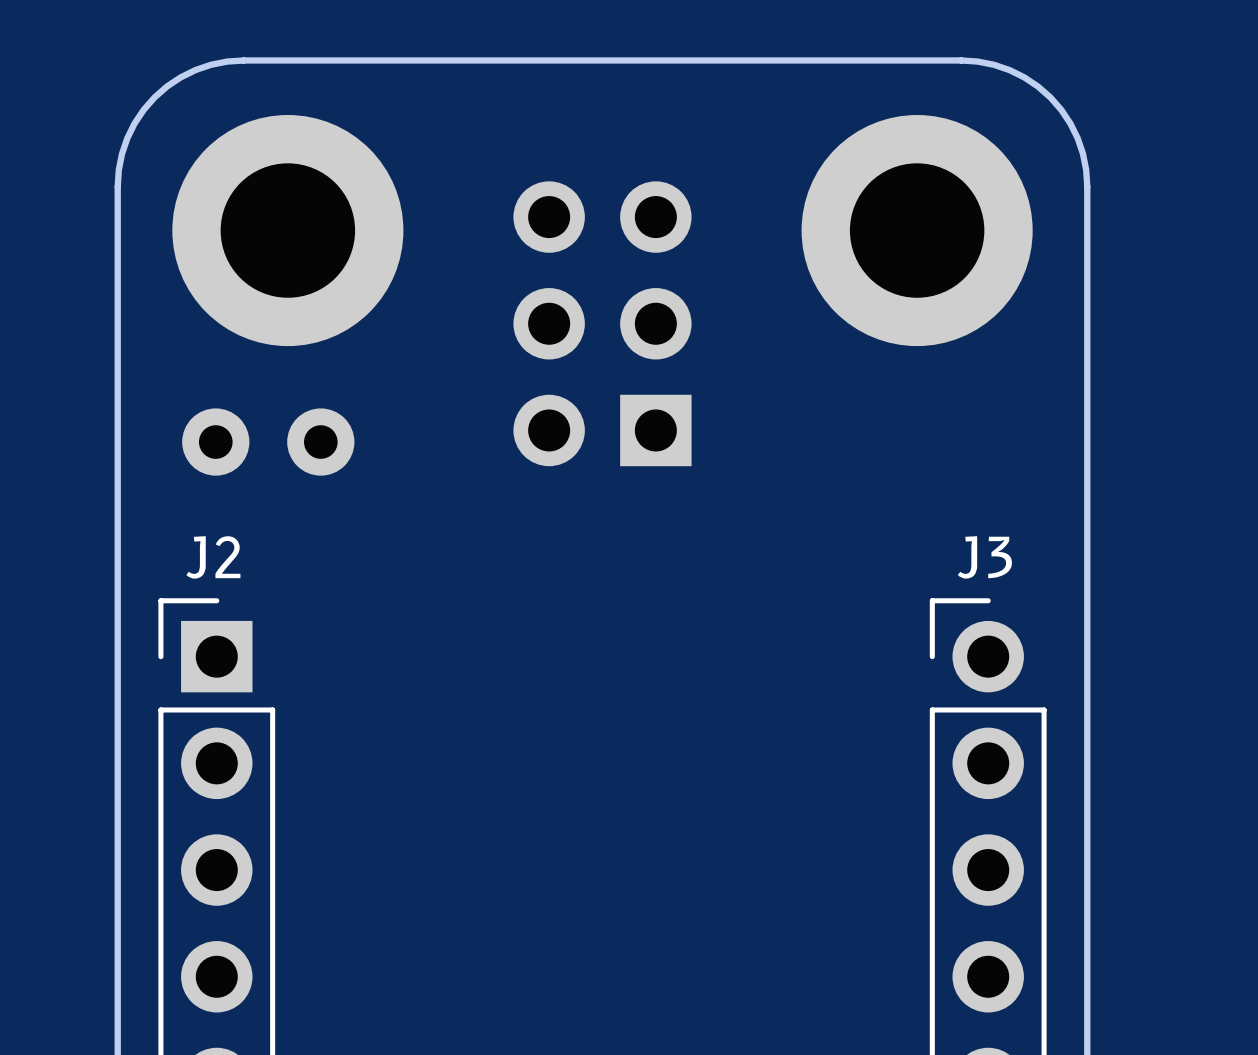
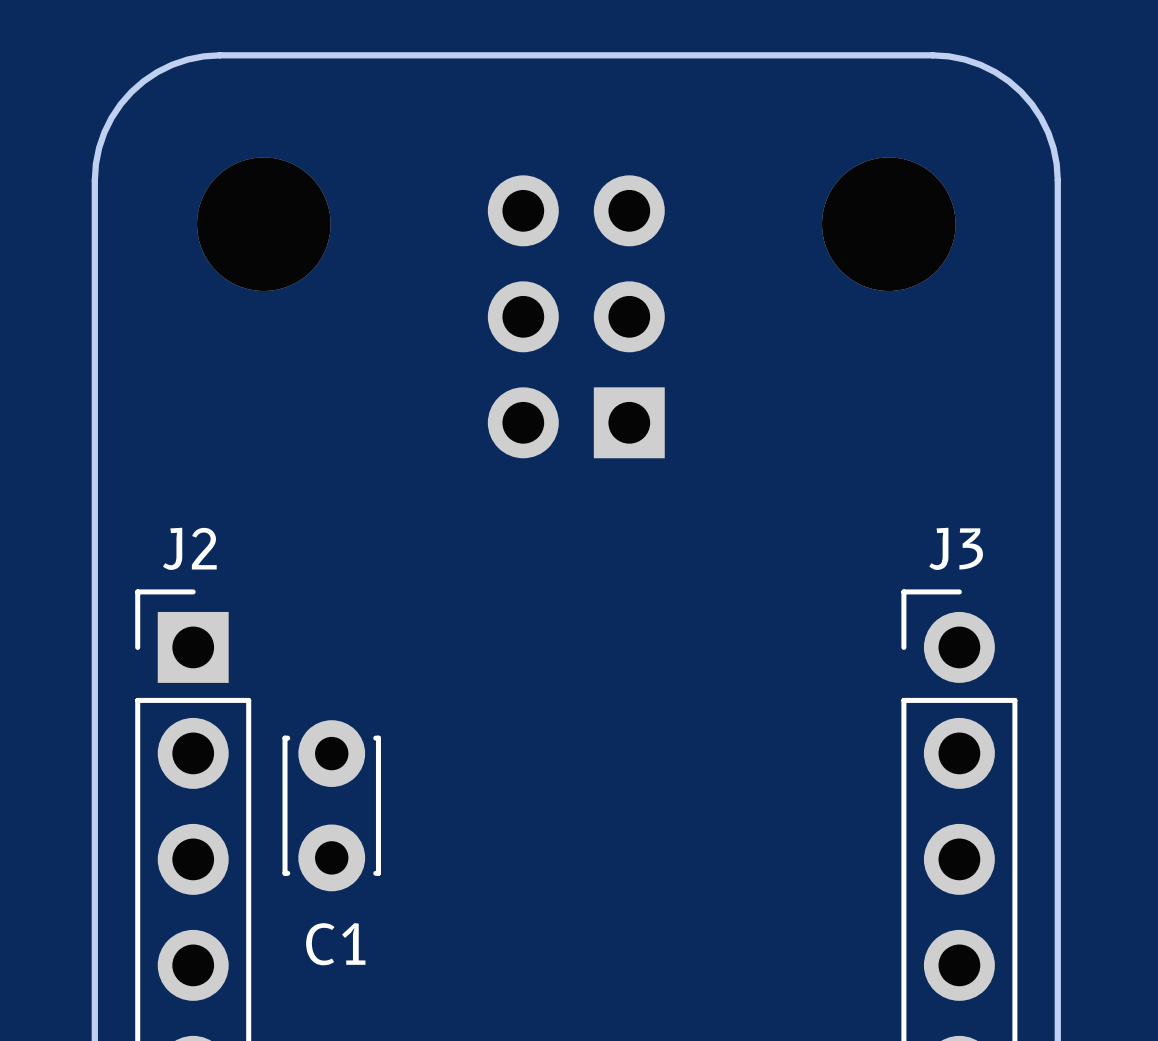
part footprint: [172, 115, 404, 347] -> [197, 157, 331, 291]
part footprint: [801, 115, 1033, 347] -> [822, 157, 956, 291]
C1 side: bottom (268, 442) -> top (331, 805)

